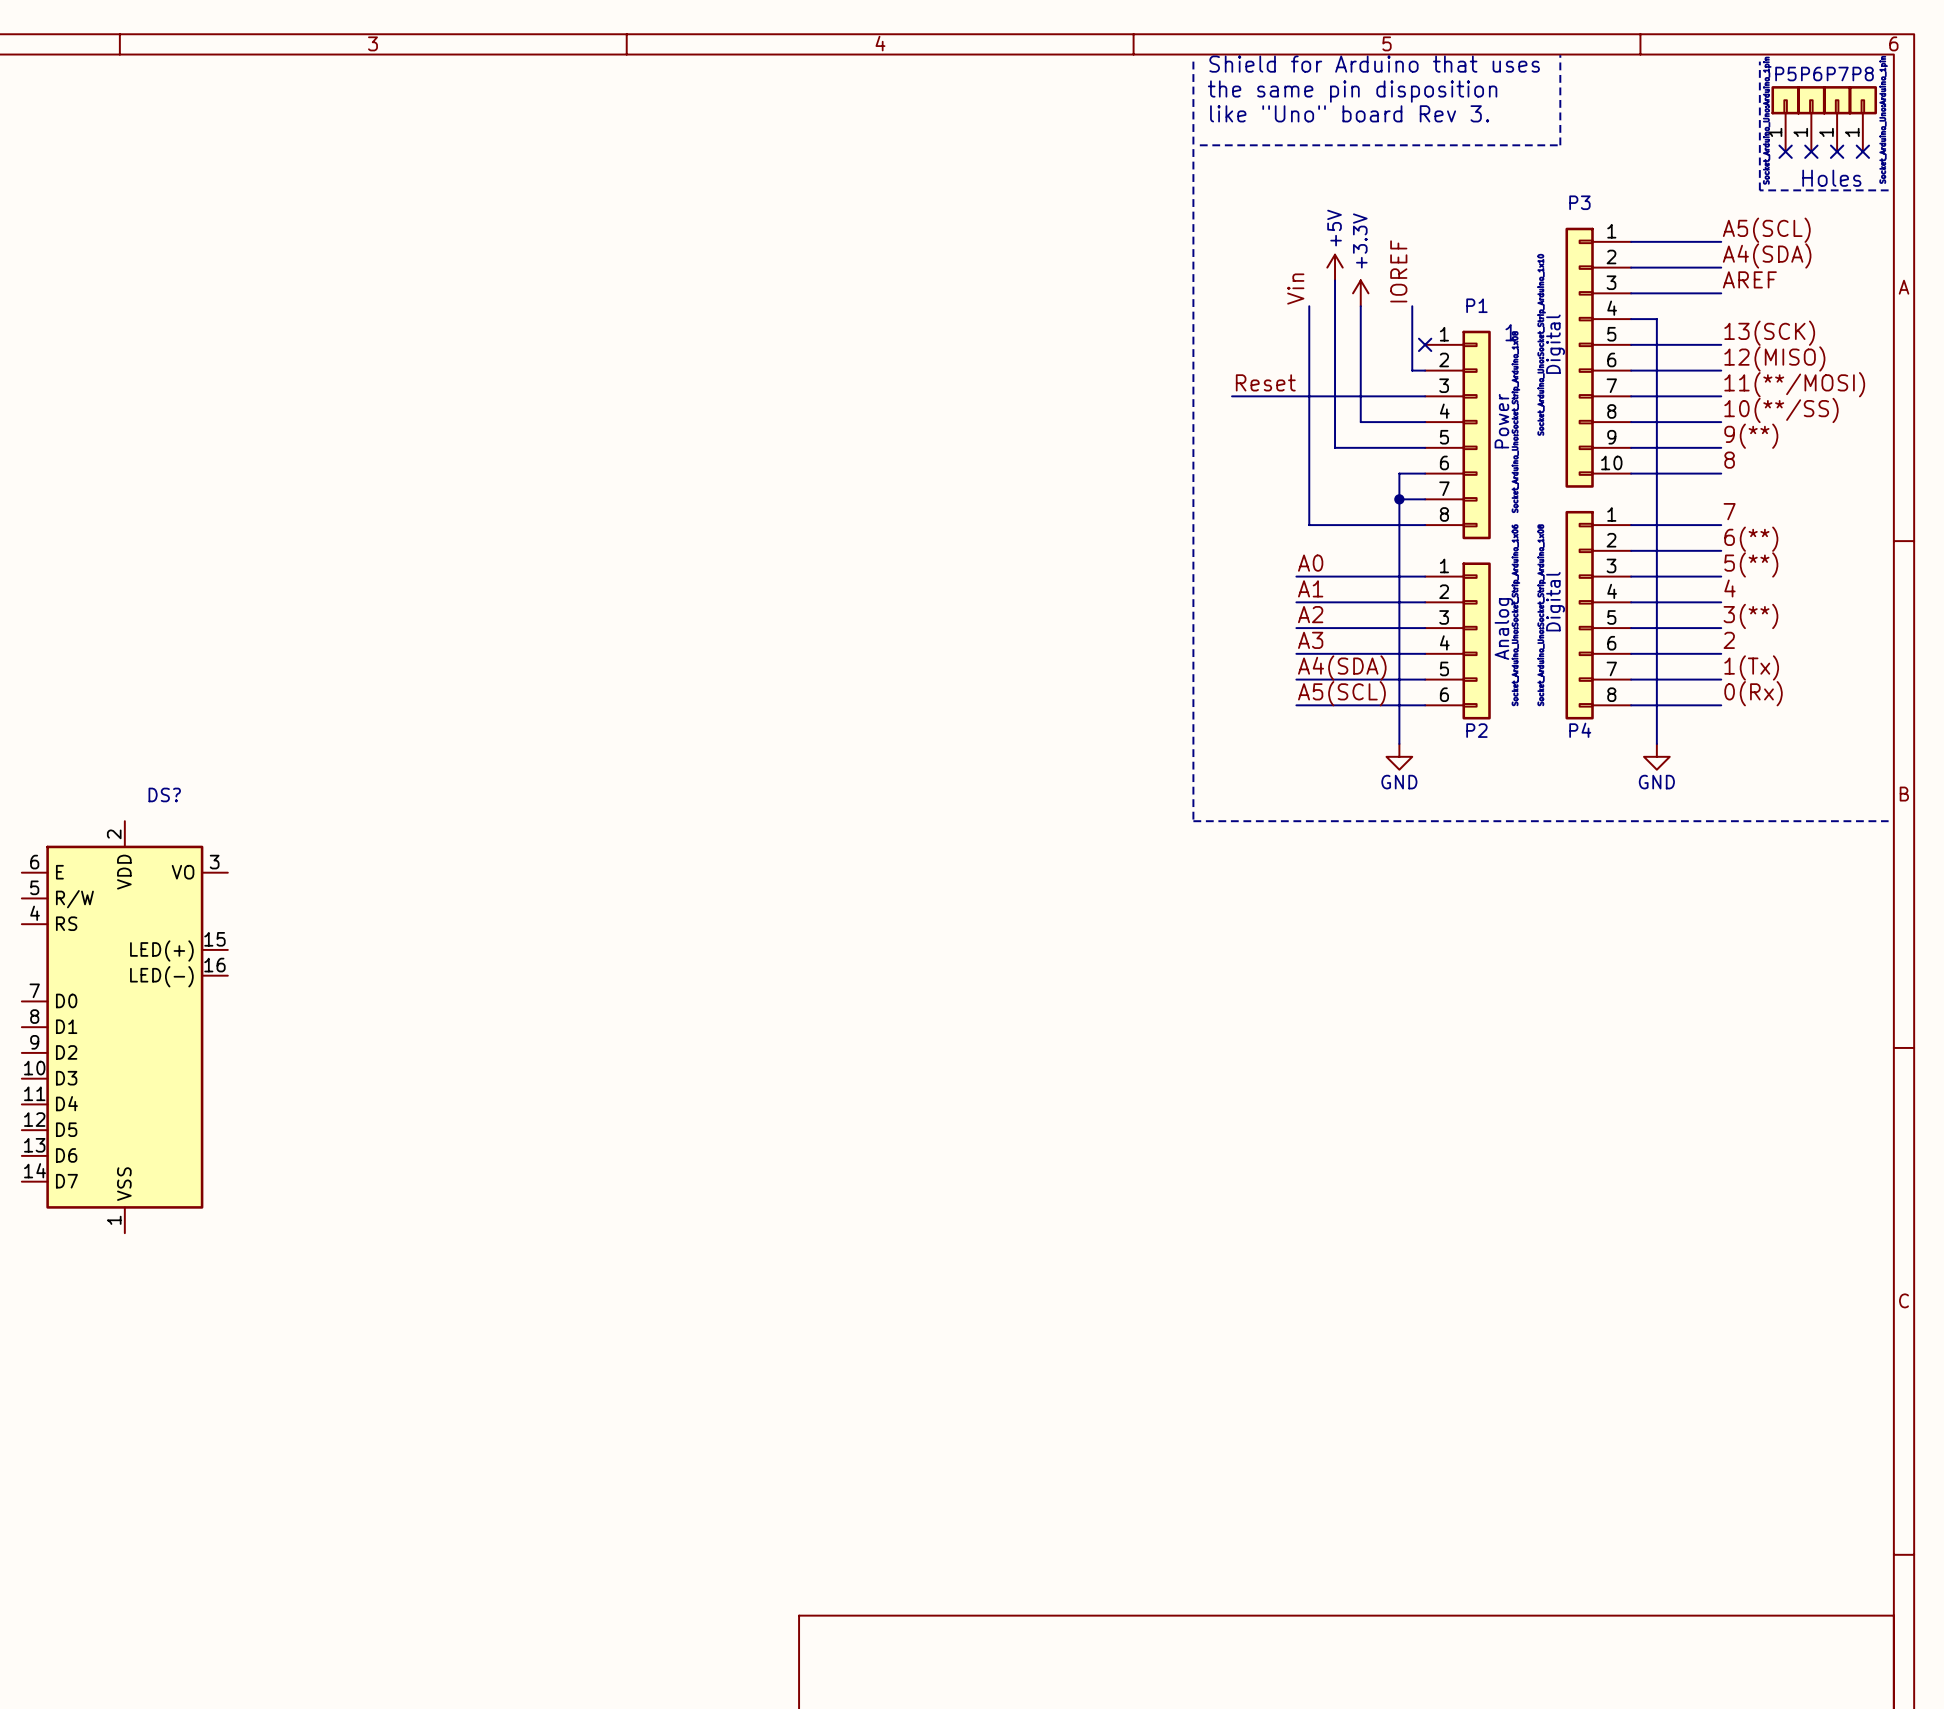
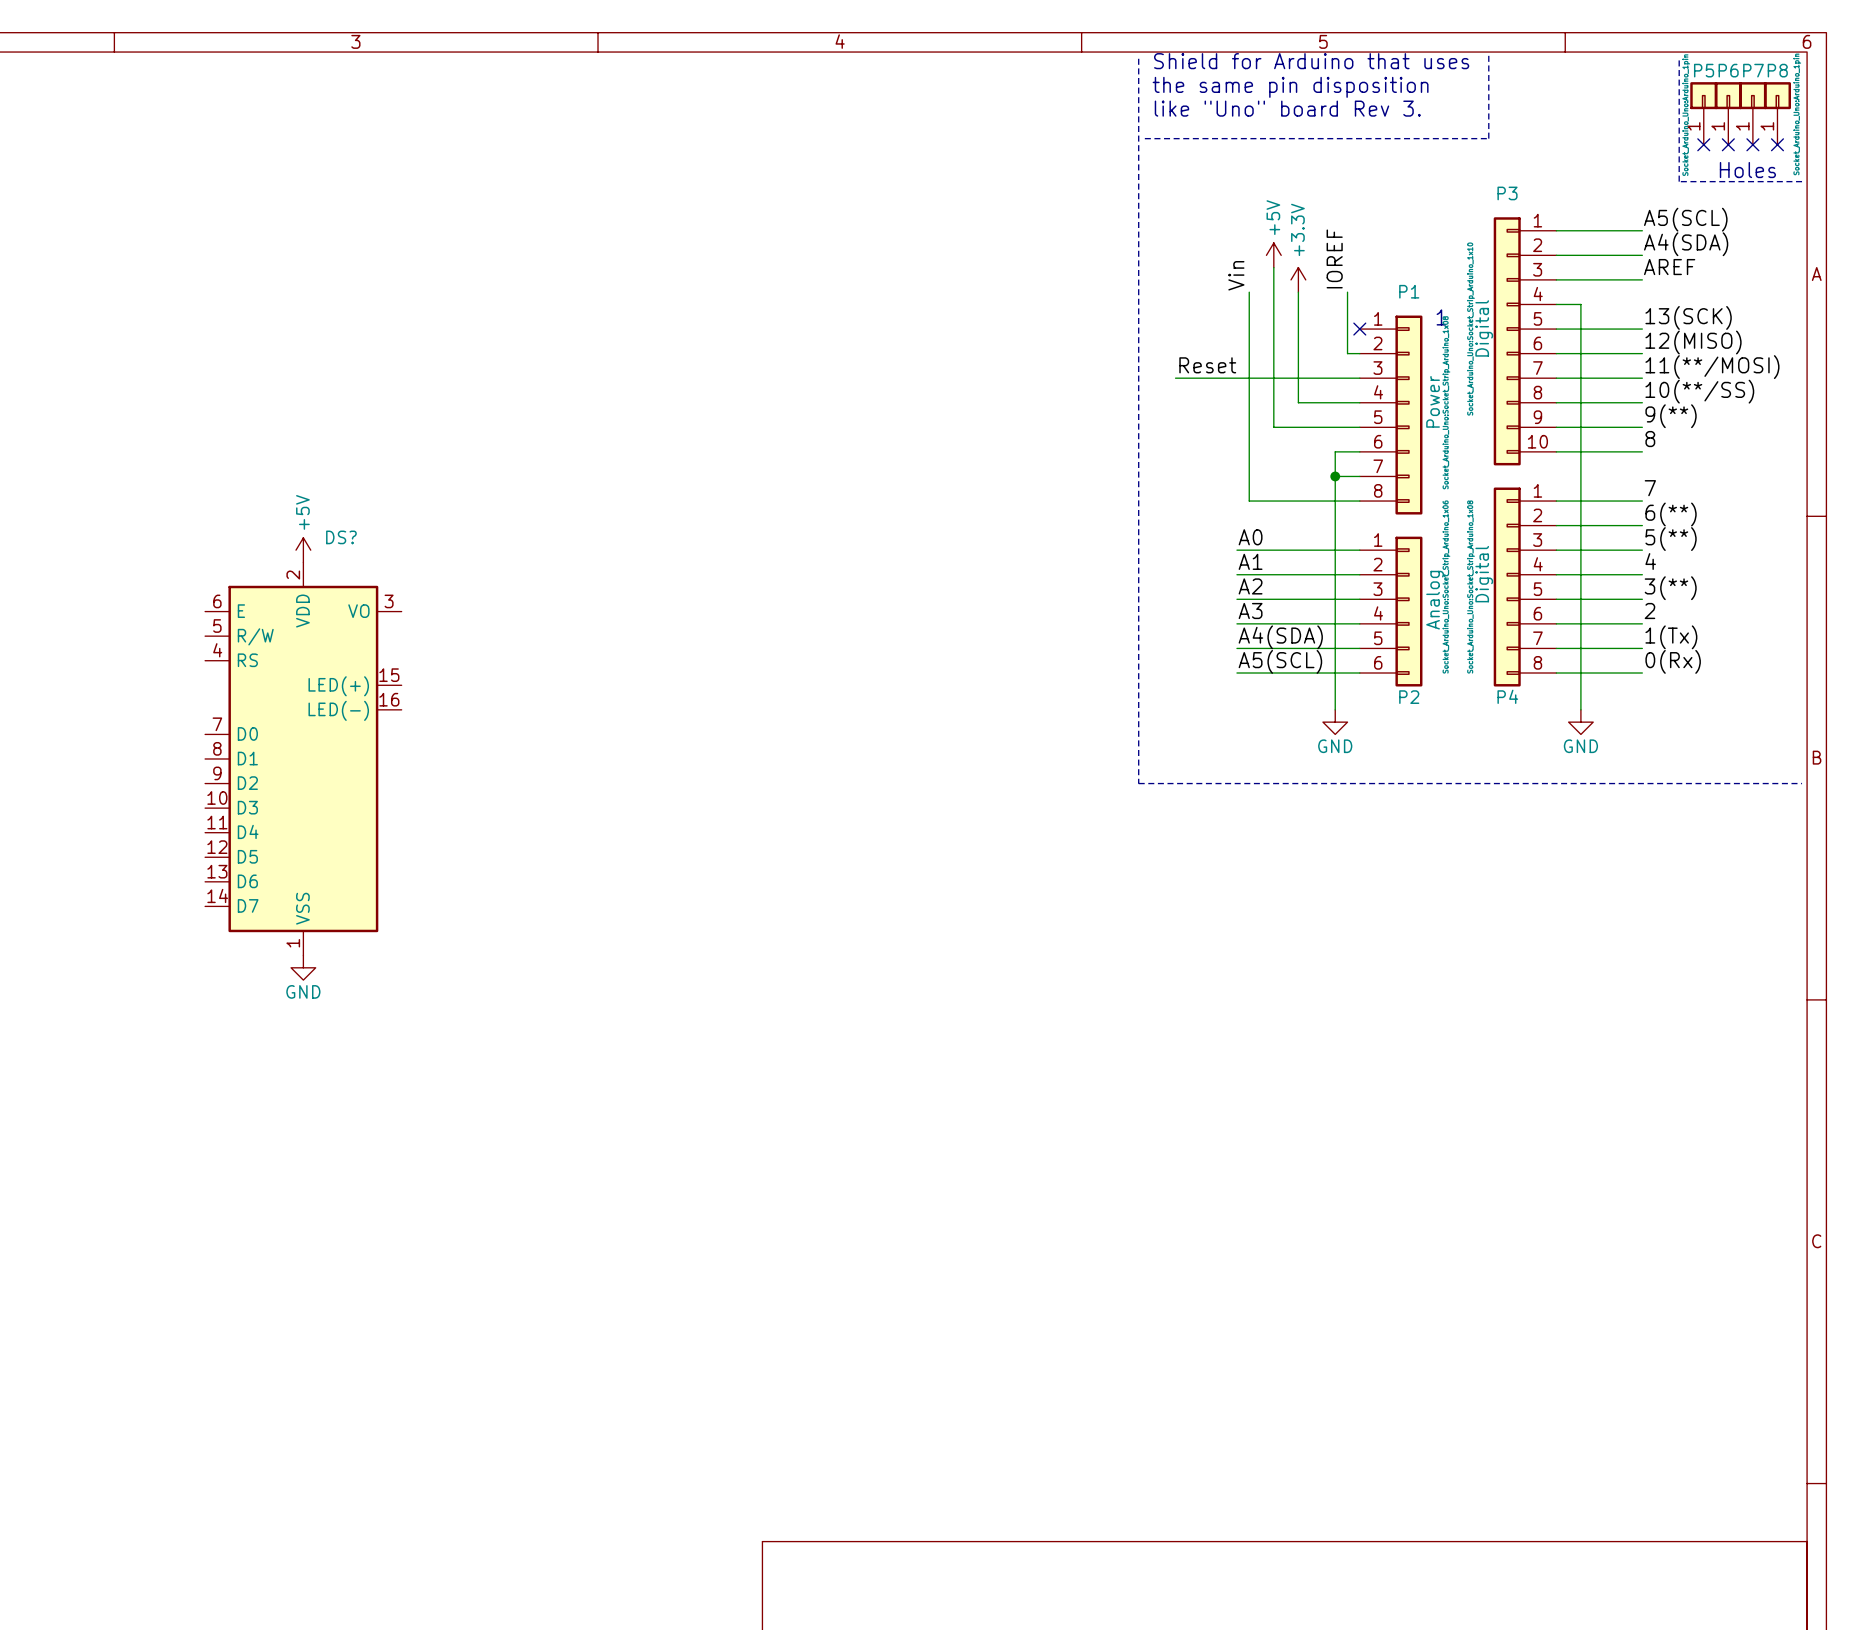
power symbol: none -> +5V (303, 550)
DS?: none -> (303, 758)
power symbol: none -> GND (303, 967)
DS?: (124, 1027) -> none

